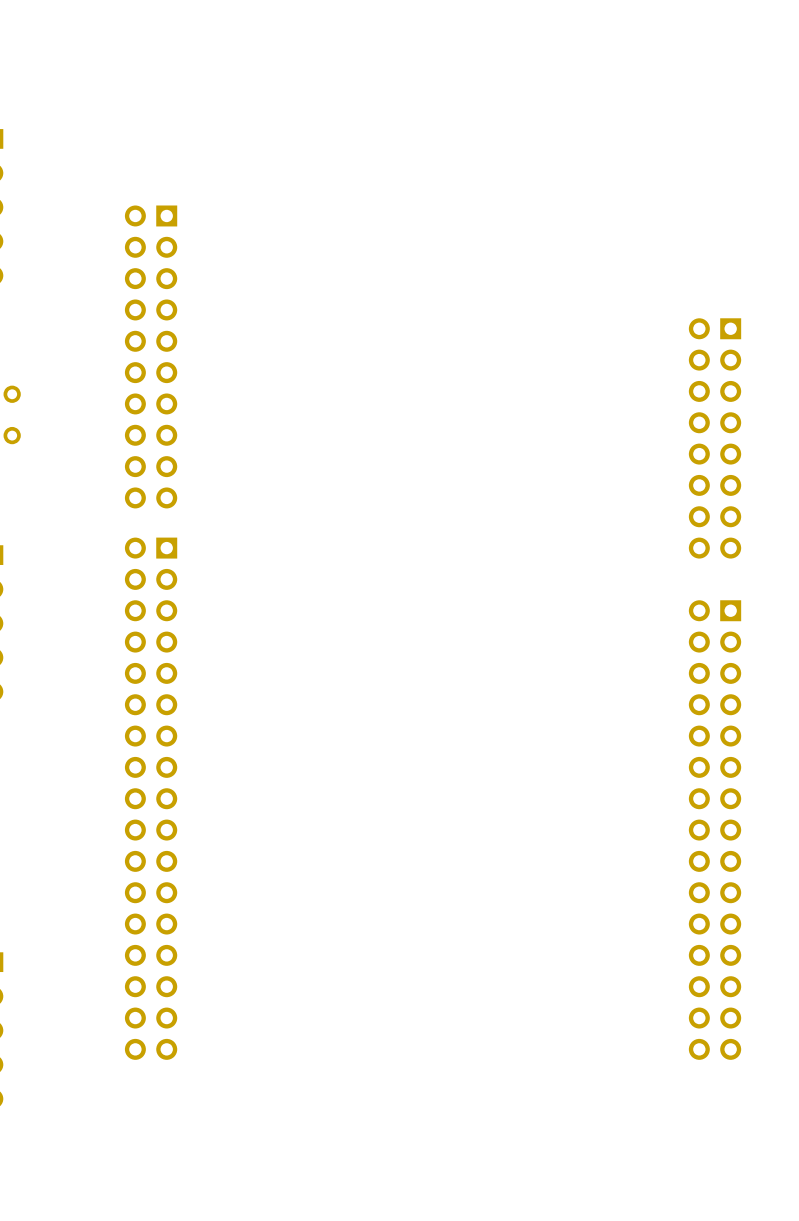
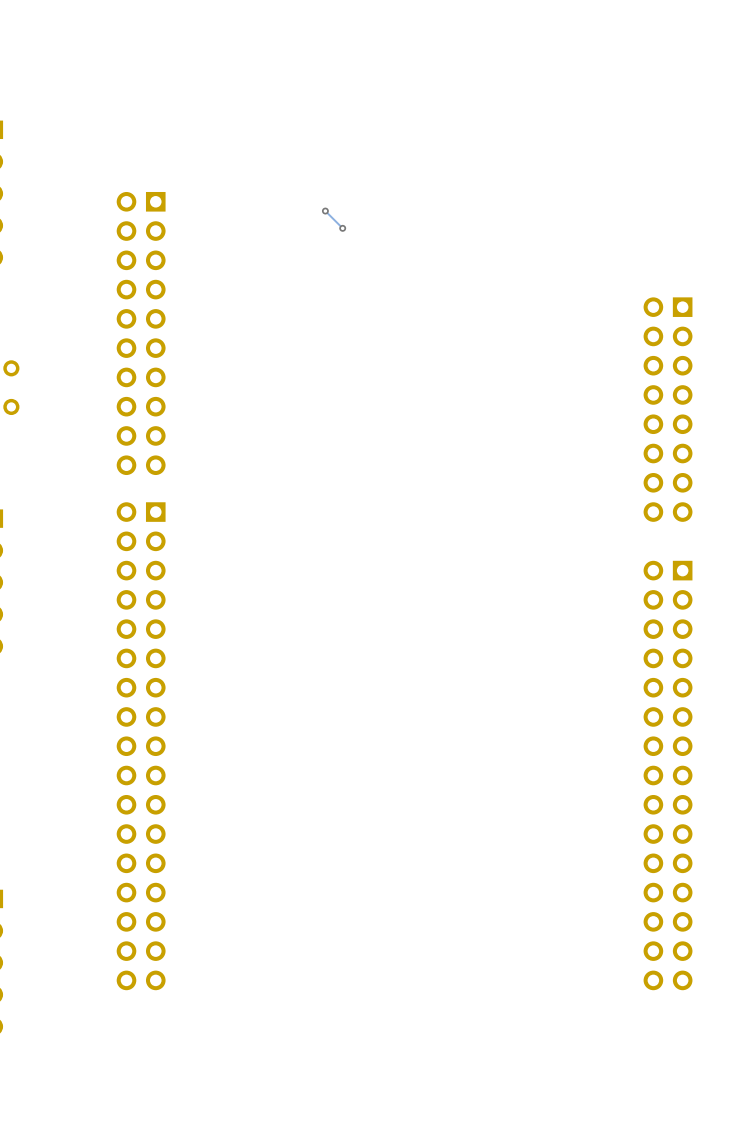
track: none -> (325, 211) (342, 228)
via: none -> (325, 211)
via: none -> (342, 228)

